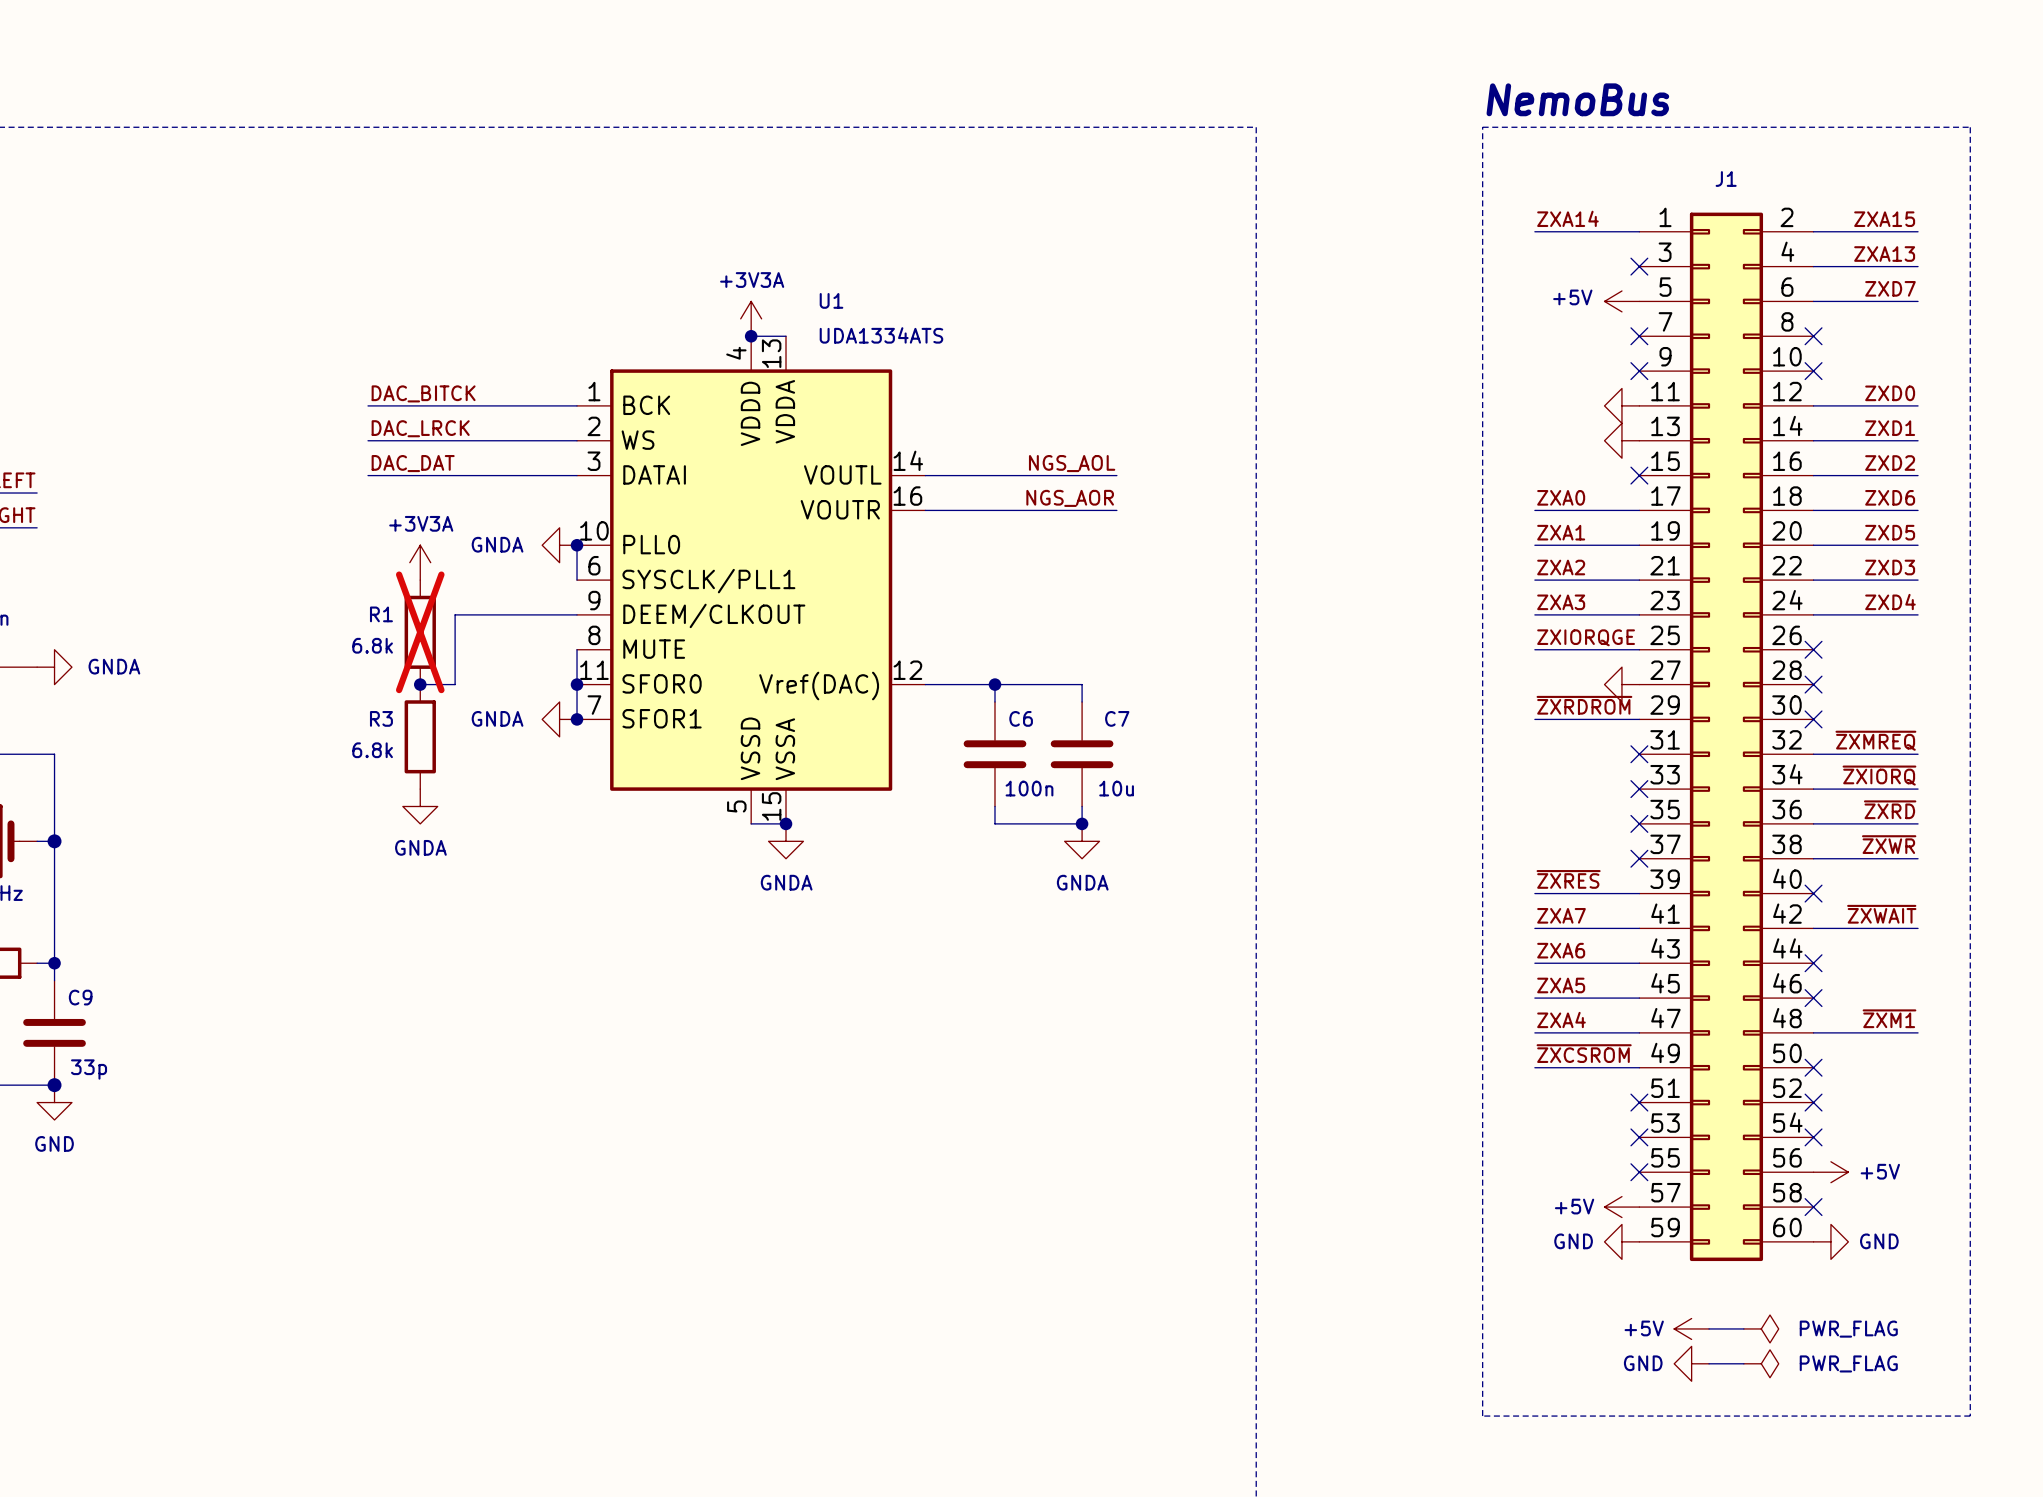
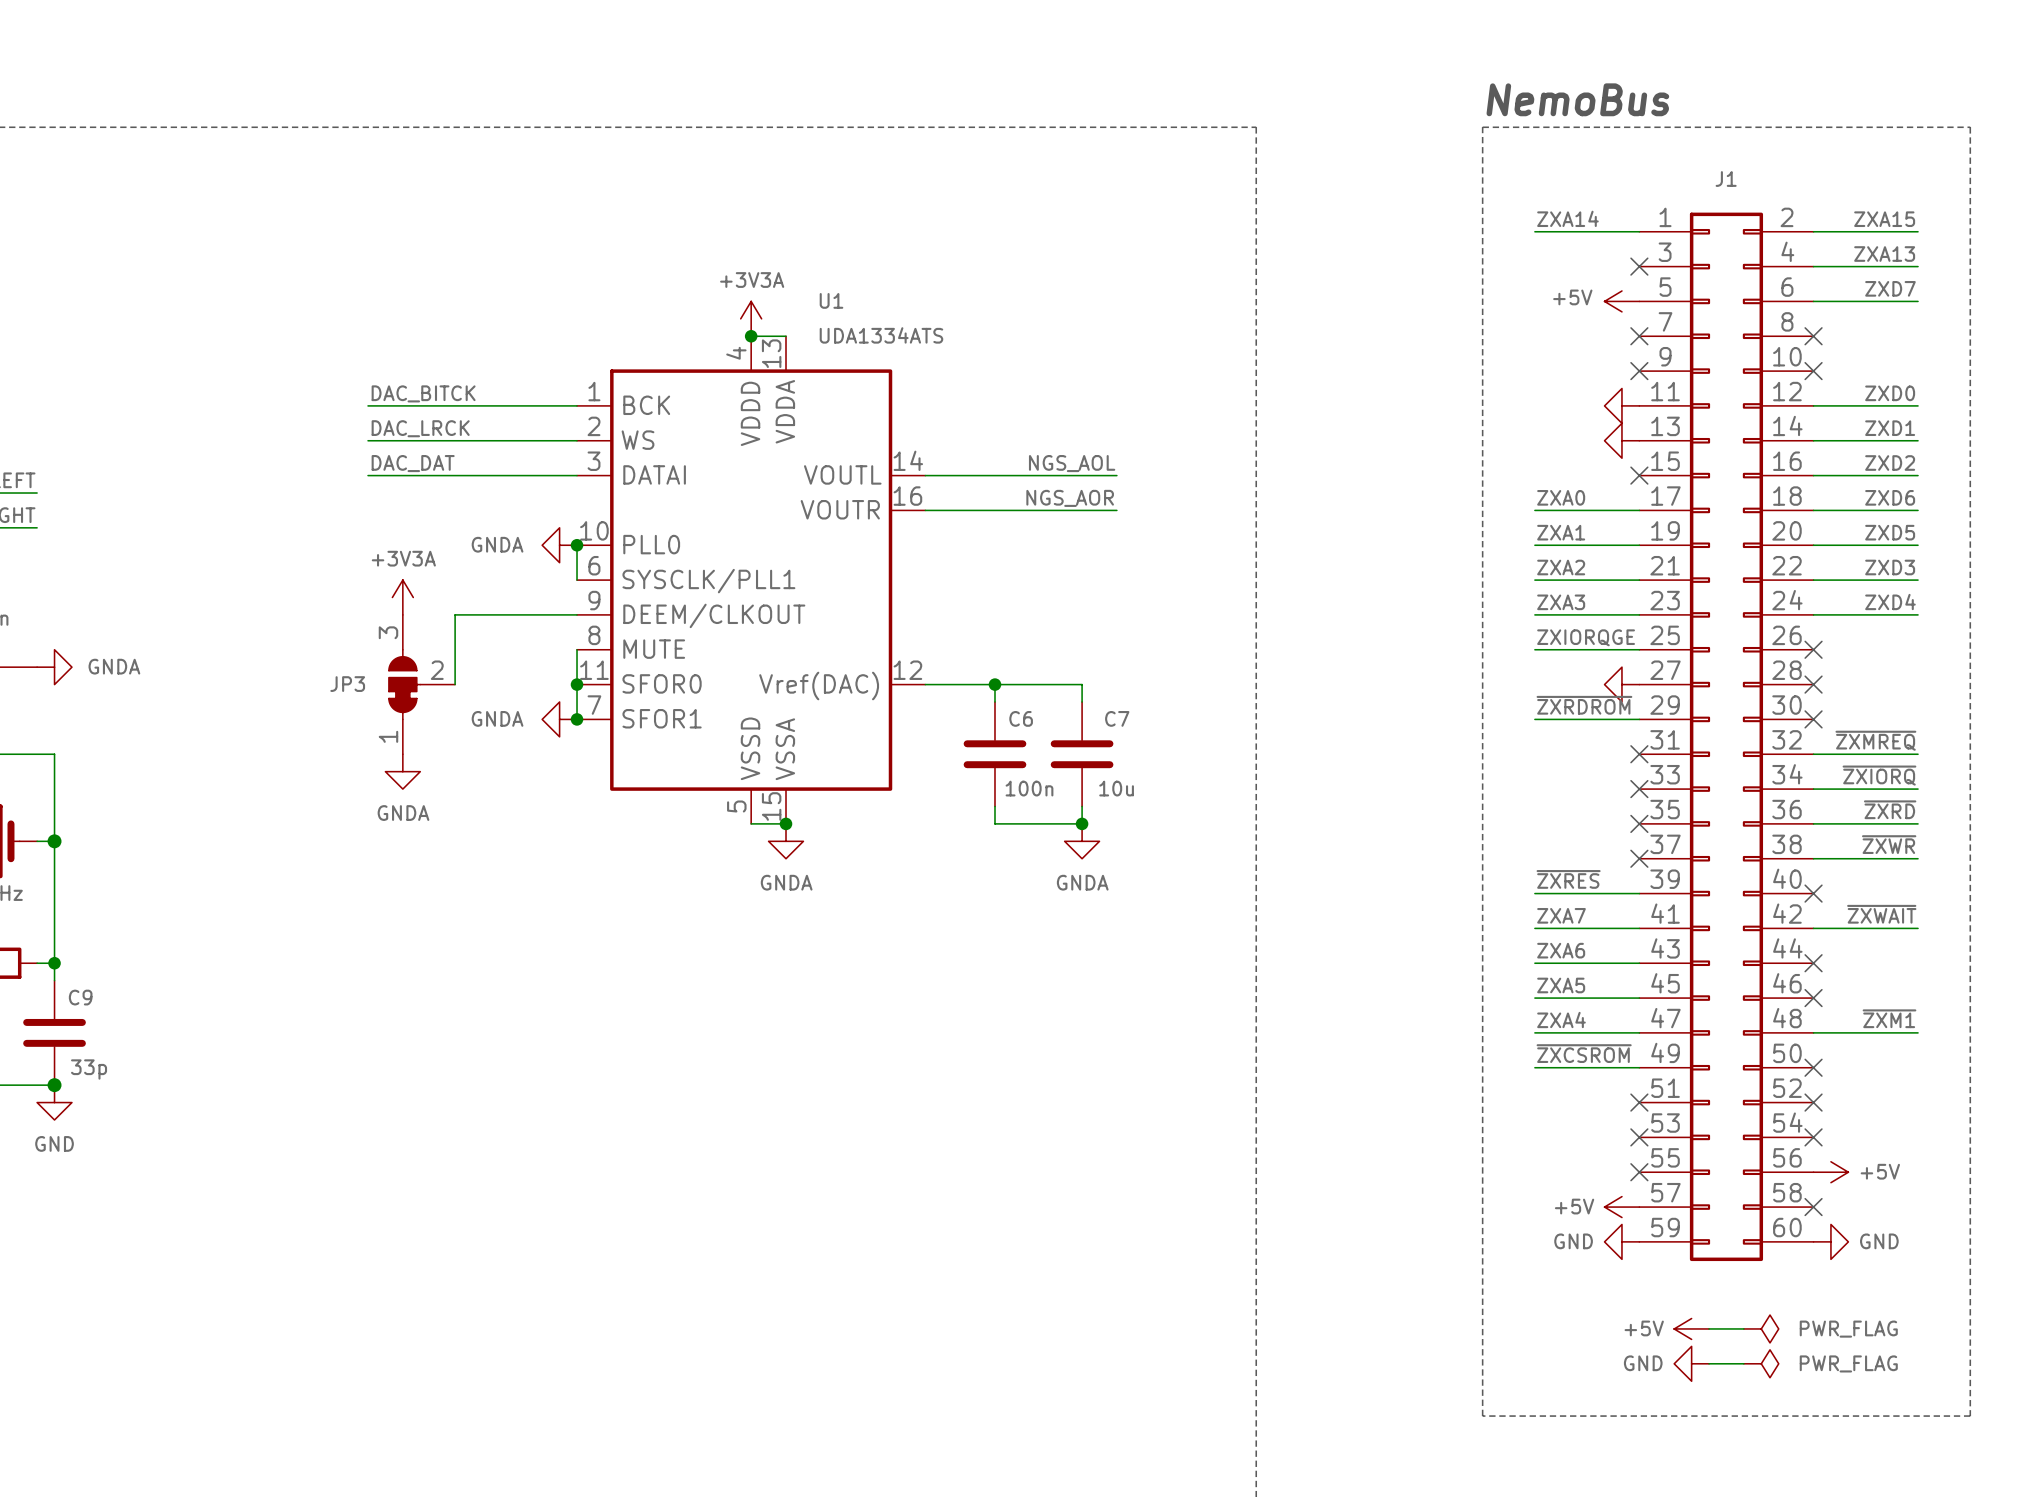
power symbol position: +3V3A (420, 562) -> +3V3A (402, 597)
R1: 6.8k (420, 632) -> none
junction: (420, 684) -> none
JP3: none -> (422, 684)
R3: 6.8k (420, 736) -> none
power symbol position: GNDA (420, 806) -> GNDA (402, 771)

